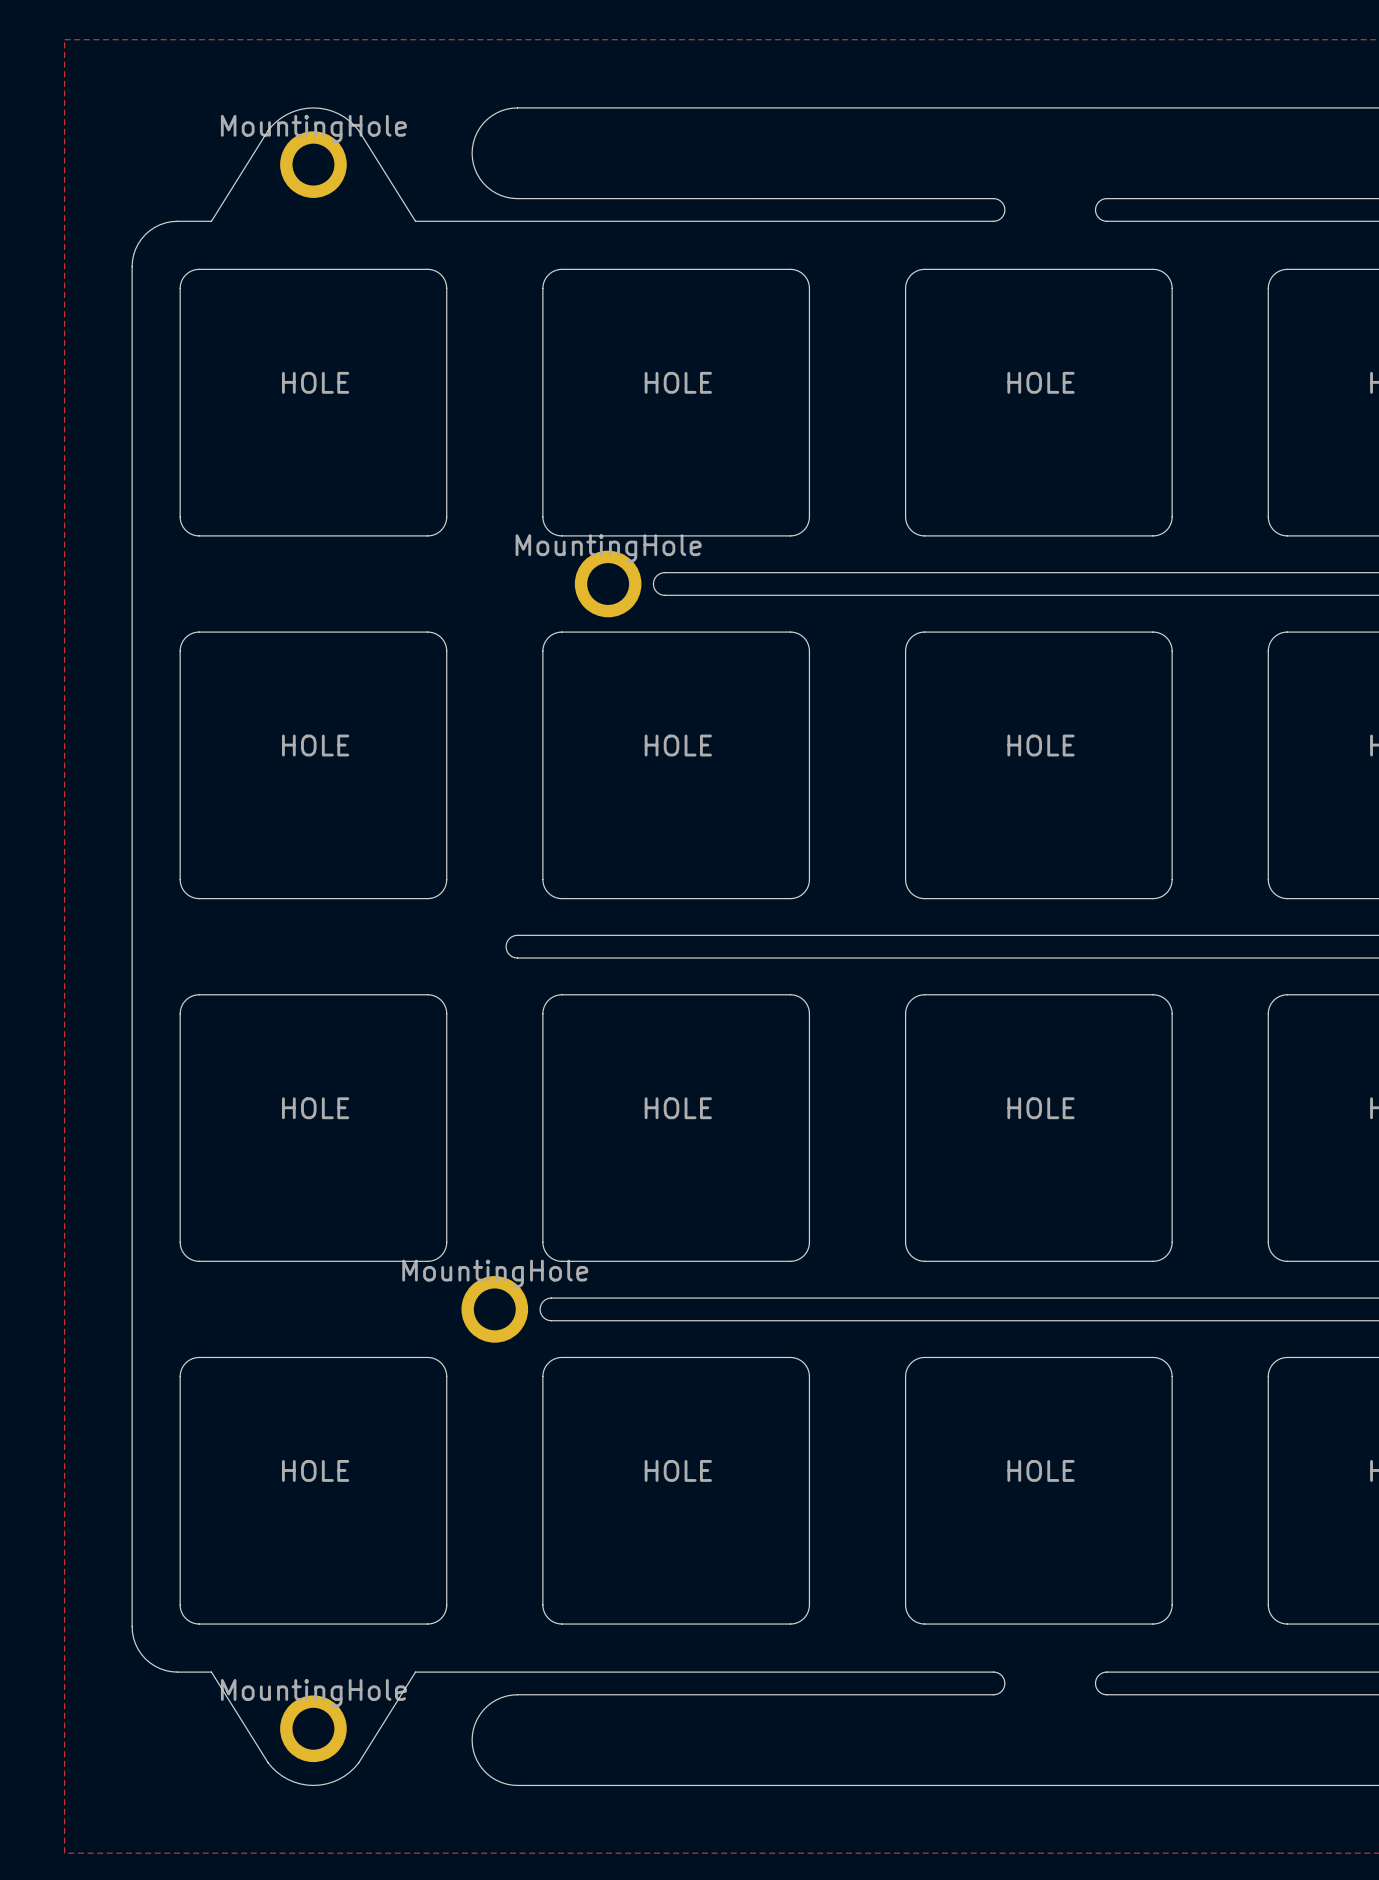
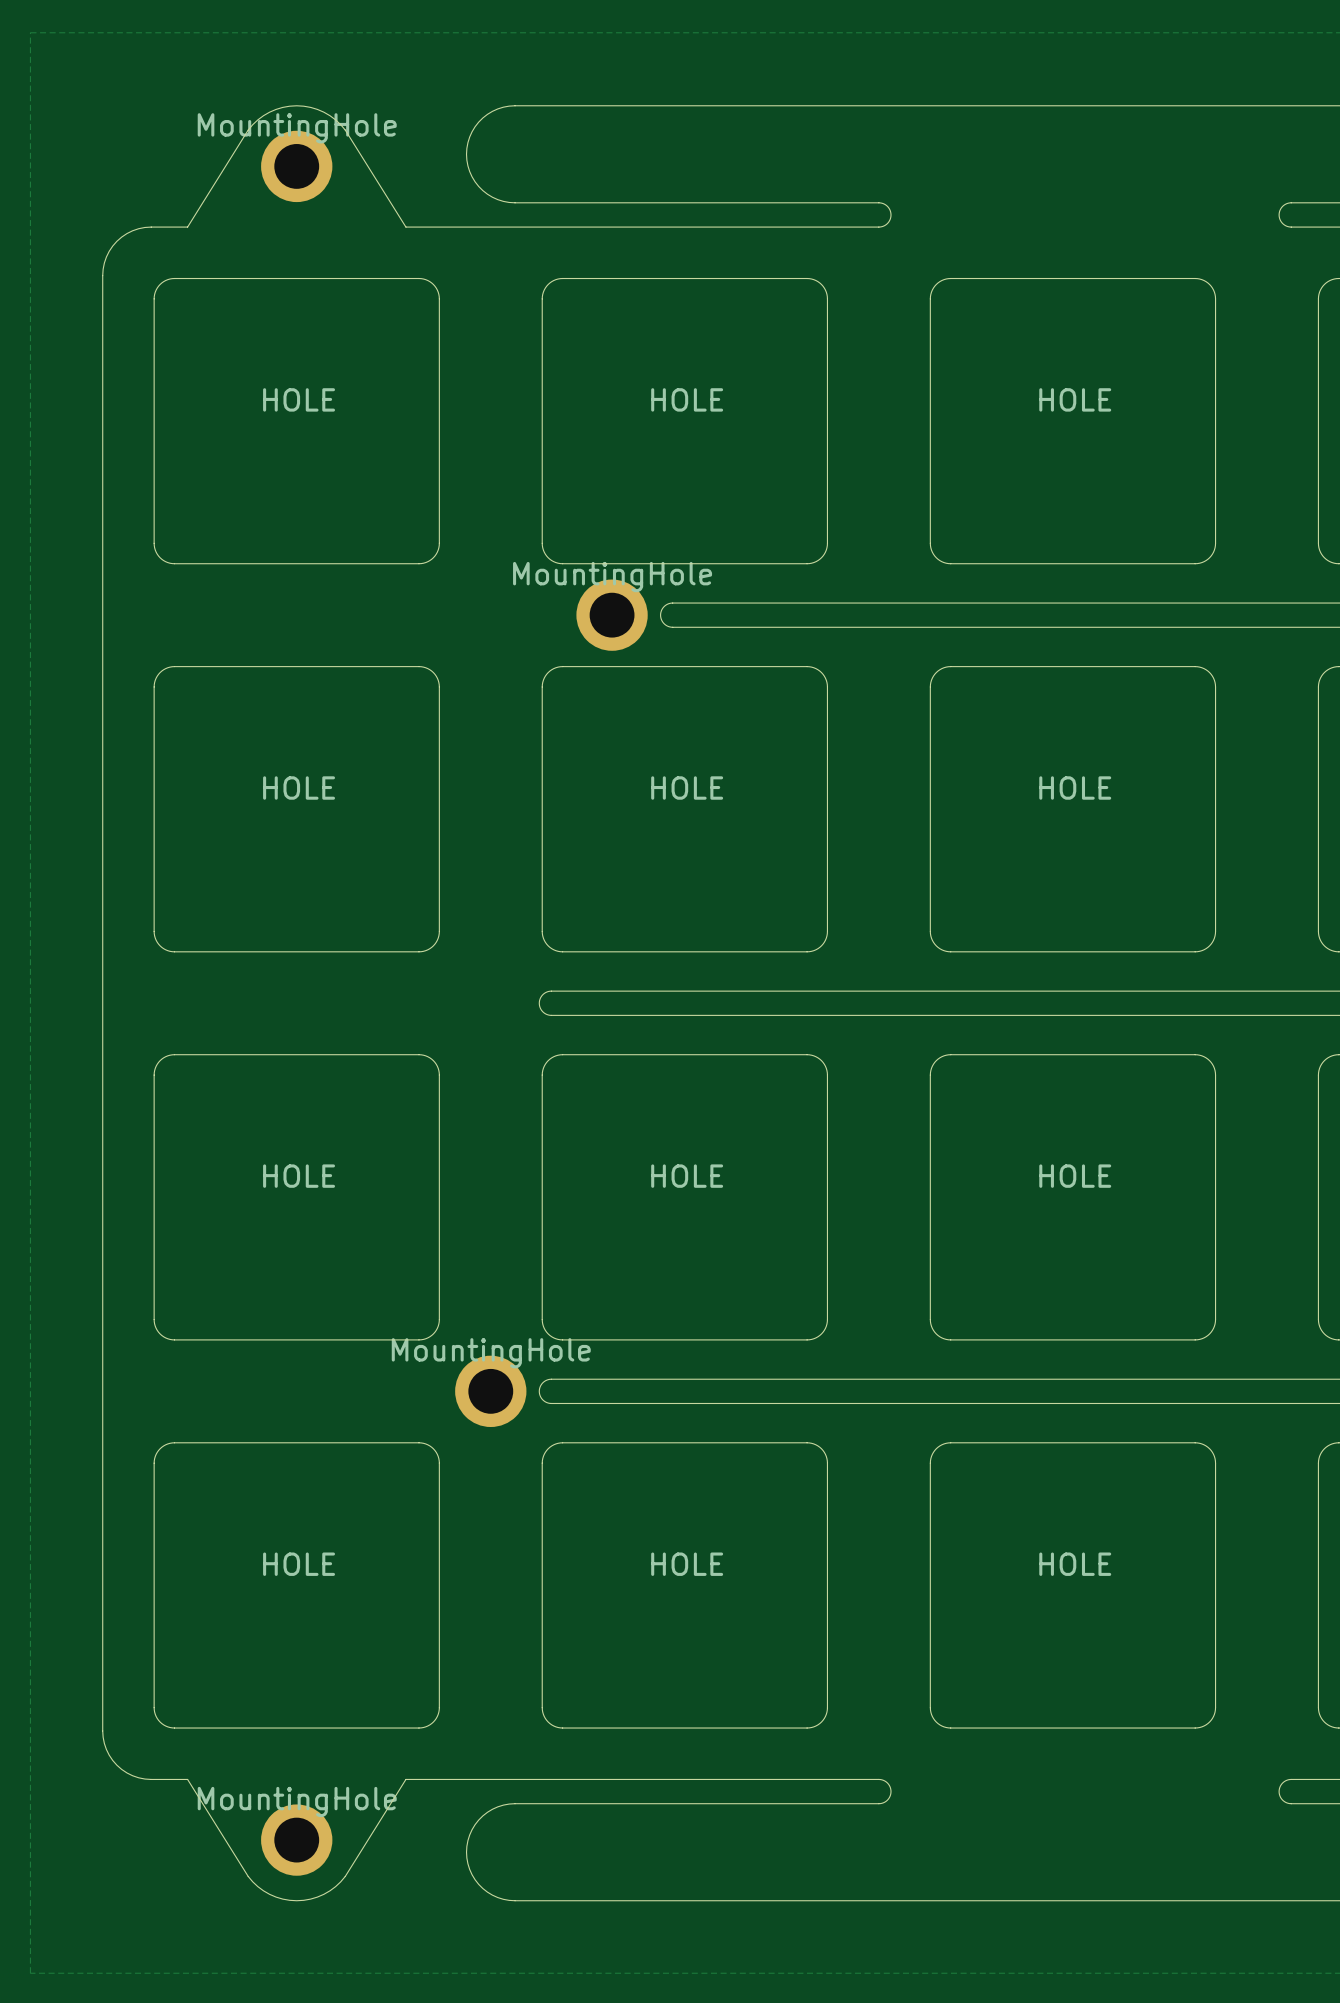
board edge: (857, 198) (994, 198) (1002, 202) (1004, 209) (1002, 217) (994, 221) (857, 221) -> (878, 202) (886, 205) (891, 214) (887, 222) (878, 227)
board edge: (1242, 198) (1105, 198) (1097, 203) (1095, 209) (1097, 216) (1105, 221) (1242, 221) -> (1291, 202) (1282, 206) (1279, 214) (1283, 224) (1291, 227)
board edge: (551, 935) (514, 935) (508, 939) (506, 946) (508, 953) (514, 957) (551, 958) -> (551, 991) (543, 994) (539, 1003) (543, 1012) (551, 1015)
board edge: (857, 1672) (994, 1672) (1001, 1675) (1004, 1683) (1001, 1691) (994, 1694) (857, 1694) -> (878, 1779) (887, 1783) (891, 1791) (887, 1800) (878, 1803)
board edge: (1242, 1672) (1105, 1672) (1098, 1675) (1095, 1683) (1098, 1690) (1105, 1694) (1242, 1694) -> (1291, 1779) (1283, 1782) (1279, 1791) (1282, 1799) (1291, 1803)

